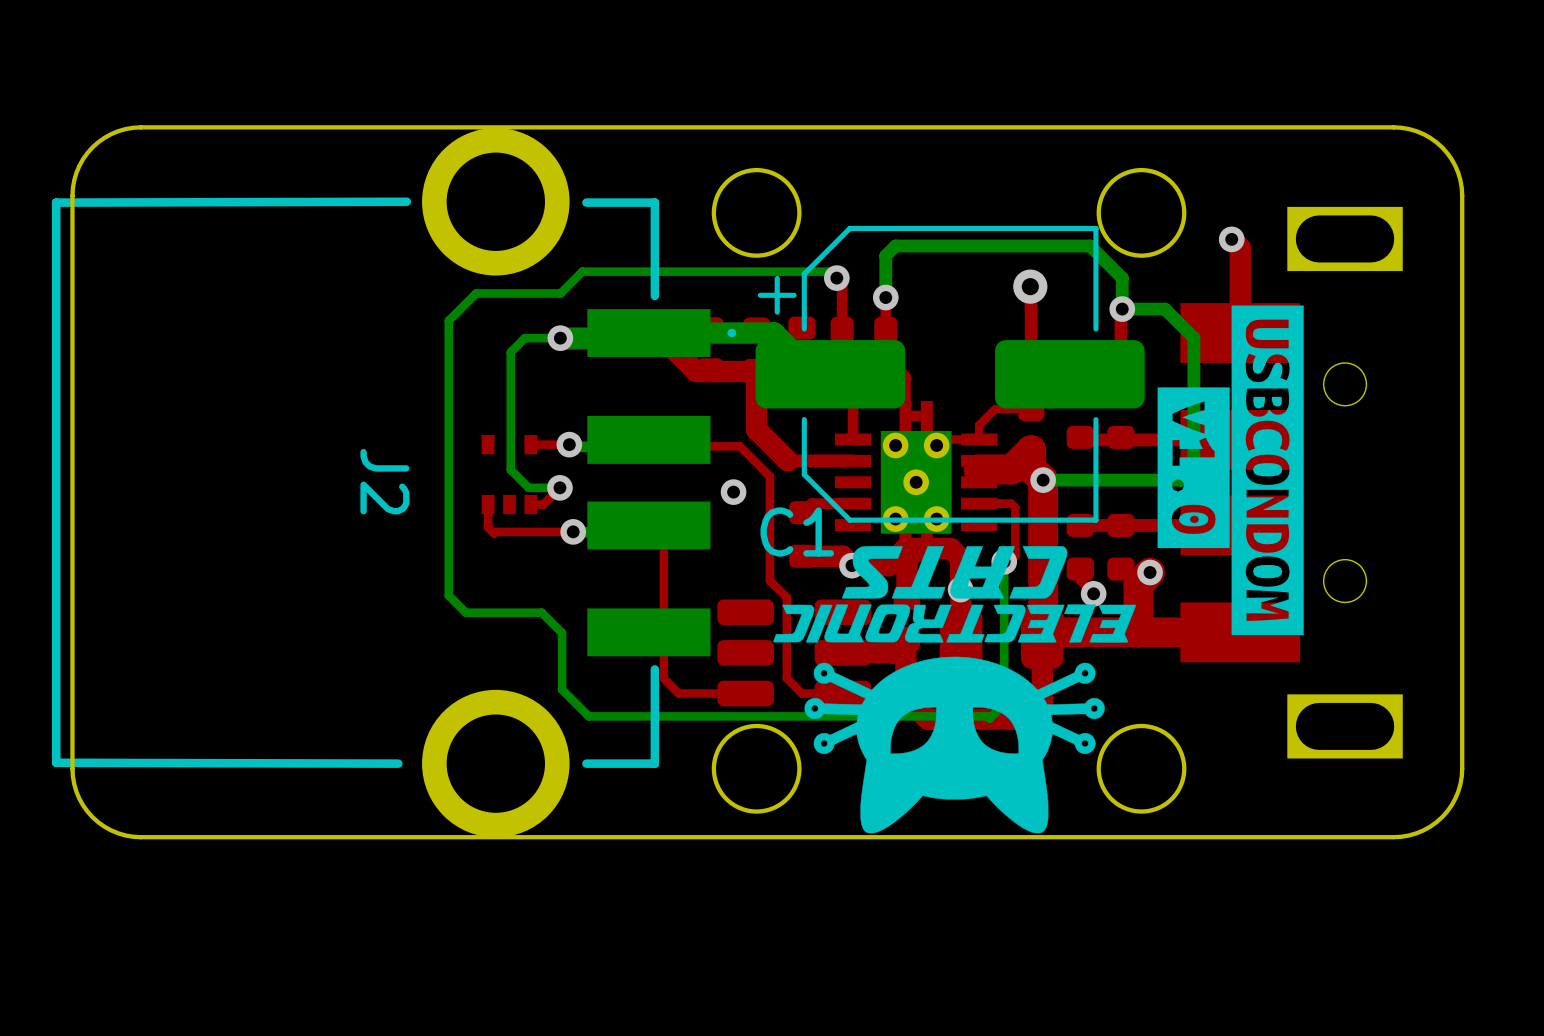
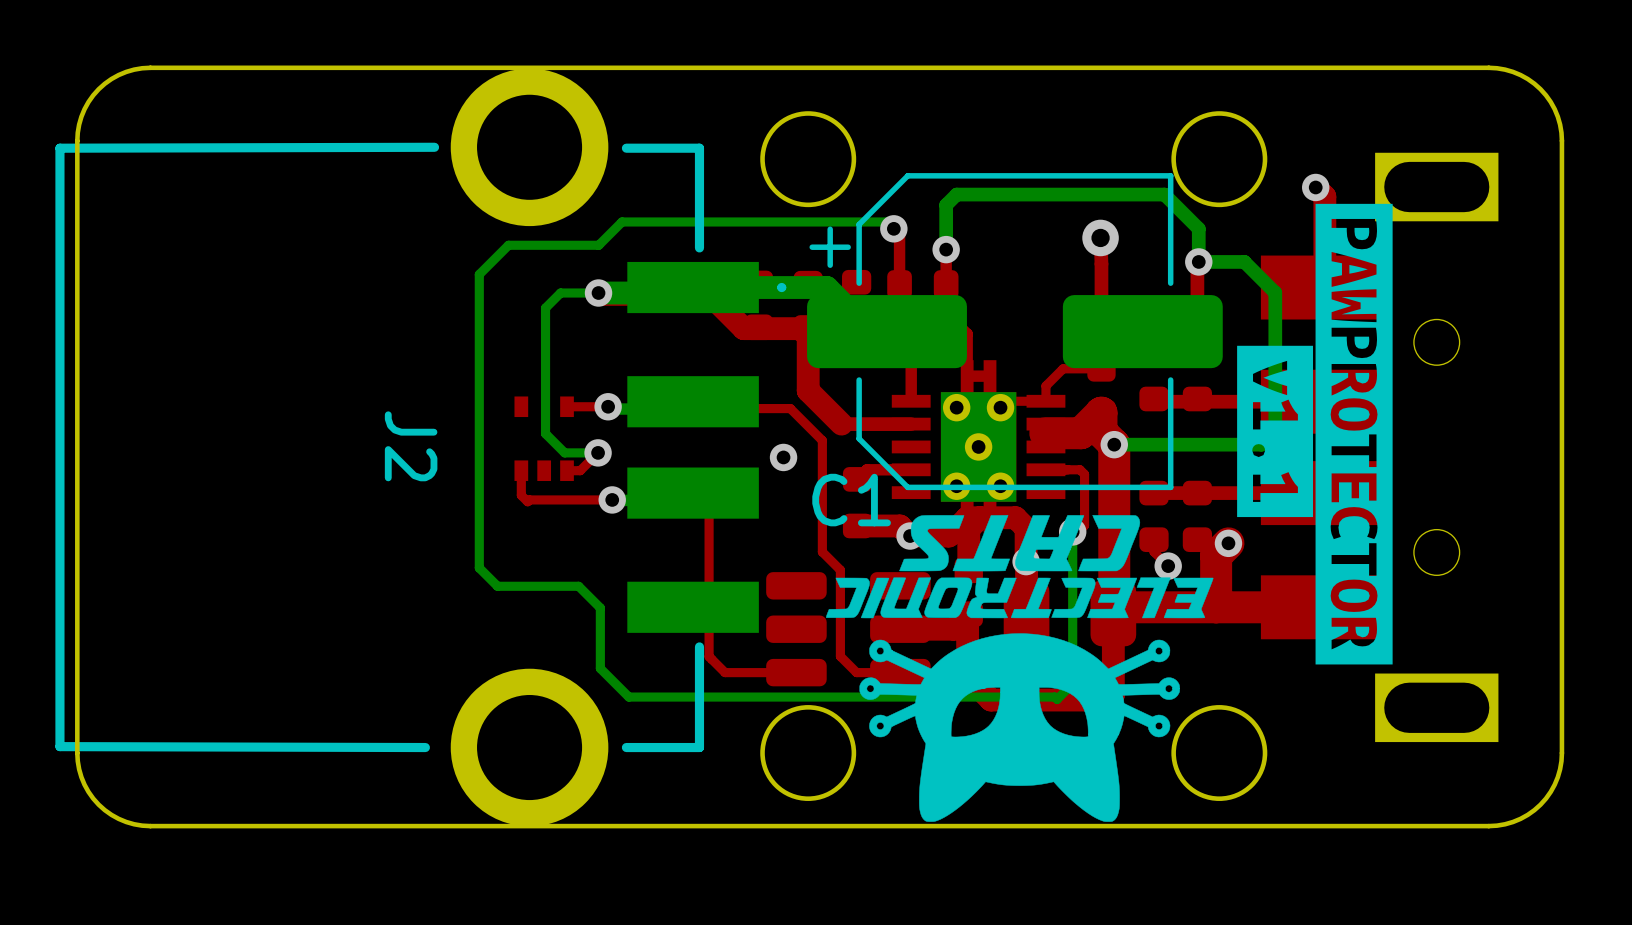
drawing shape: [1231, 305, 1304, 636] -> [1315, 203, 1393, 665]
drawing shape: [1157, 387, 1230, 549] -> [1237, 345, 1314, 518]

